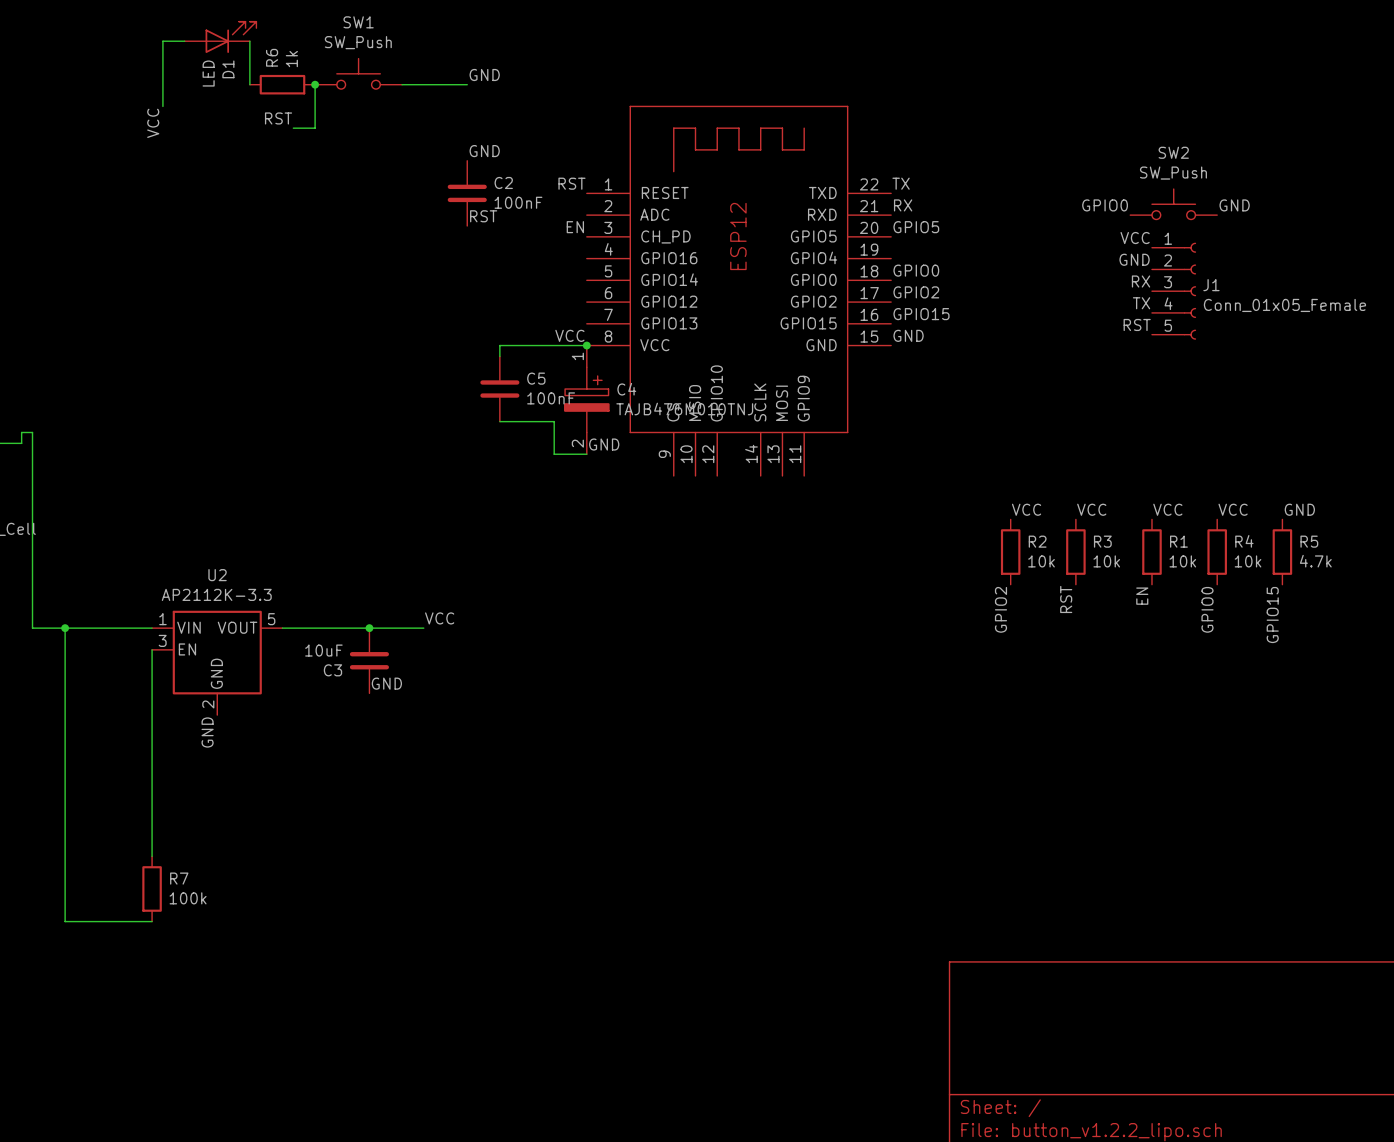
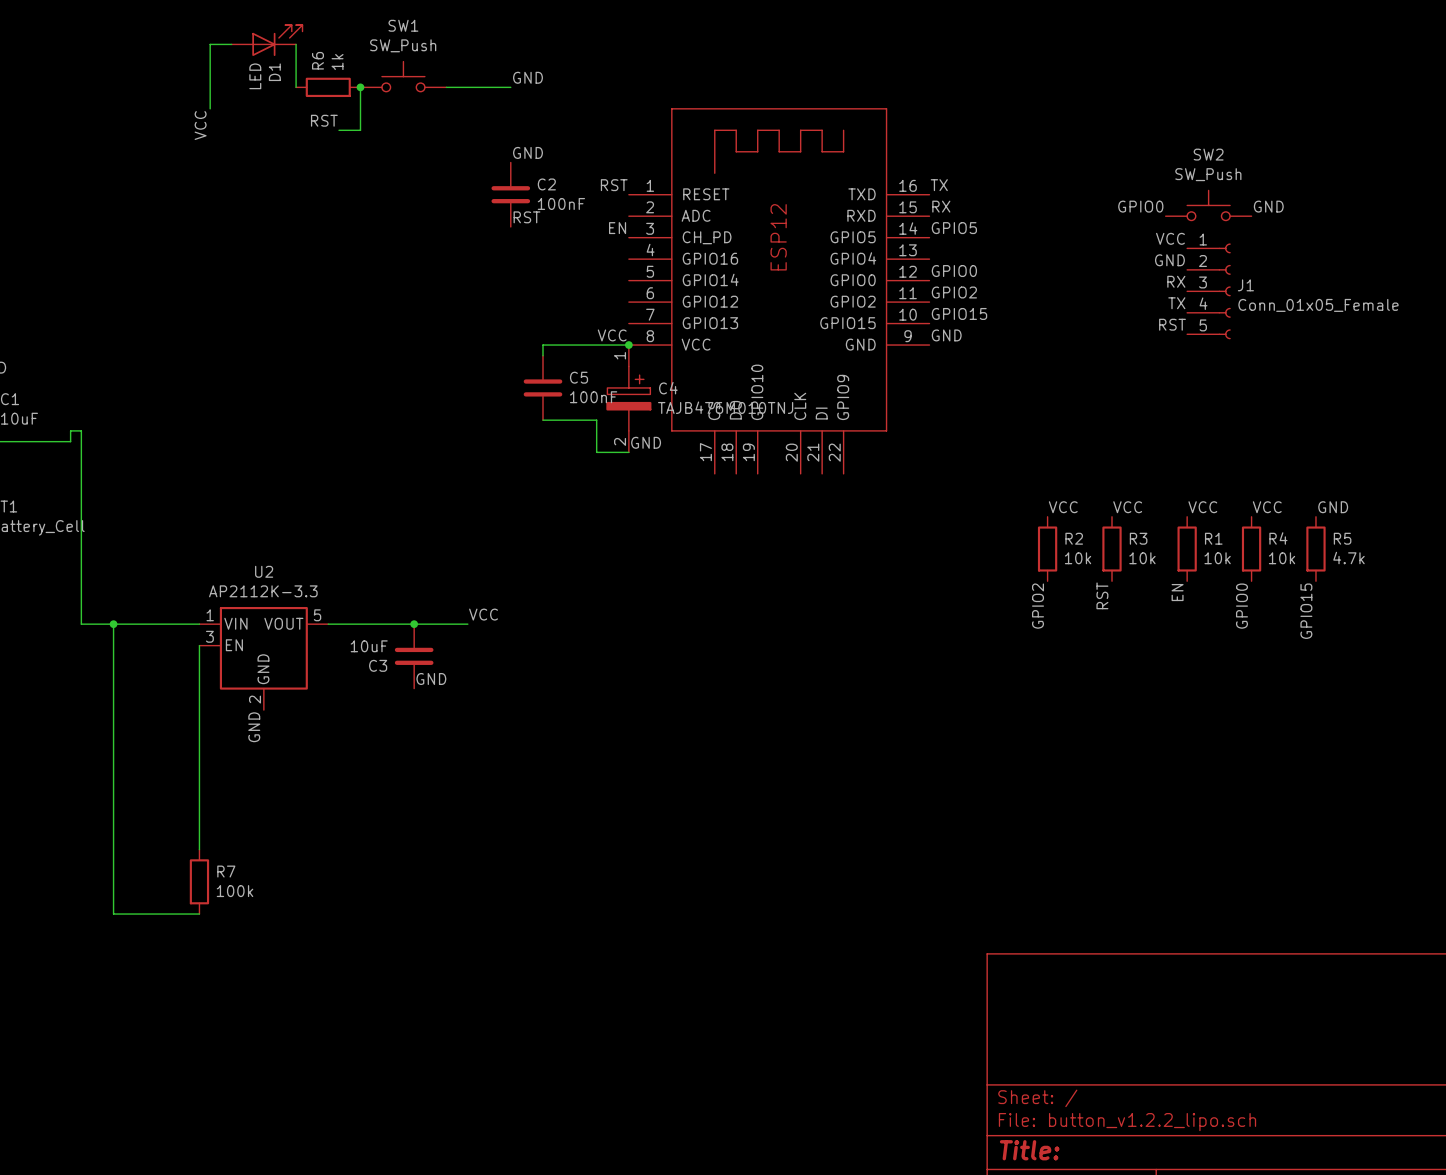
part symbol: [586, 106, 892, 476] -> [628, 108, 930, 474]

